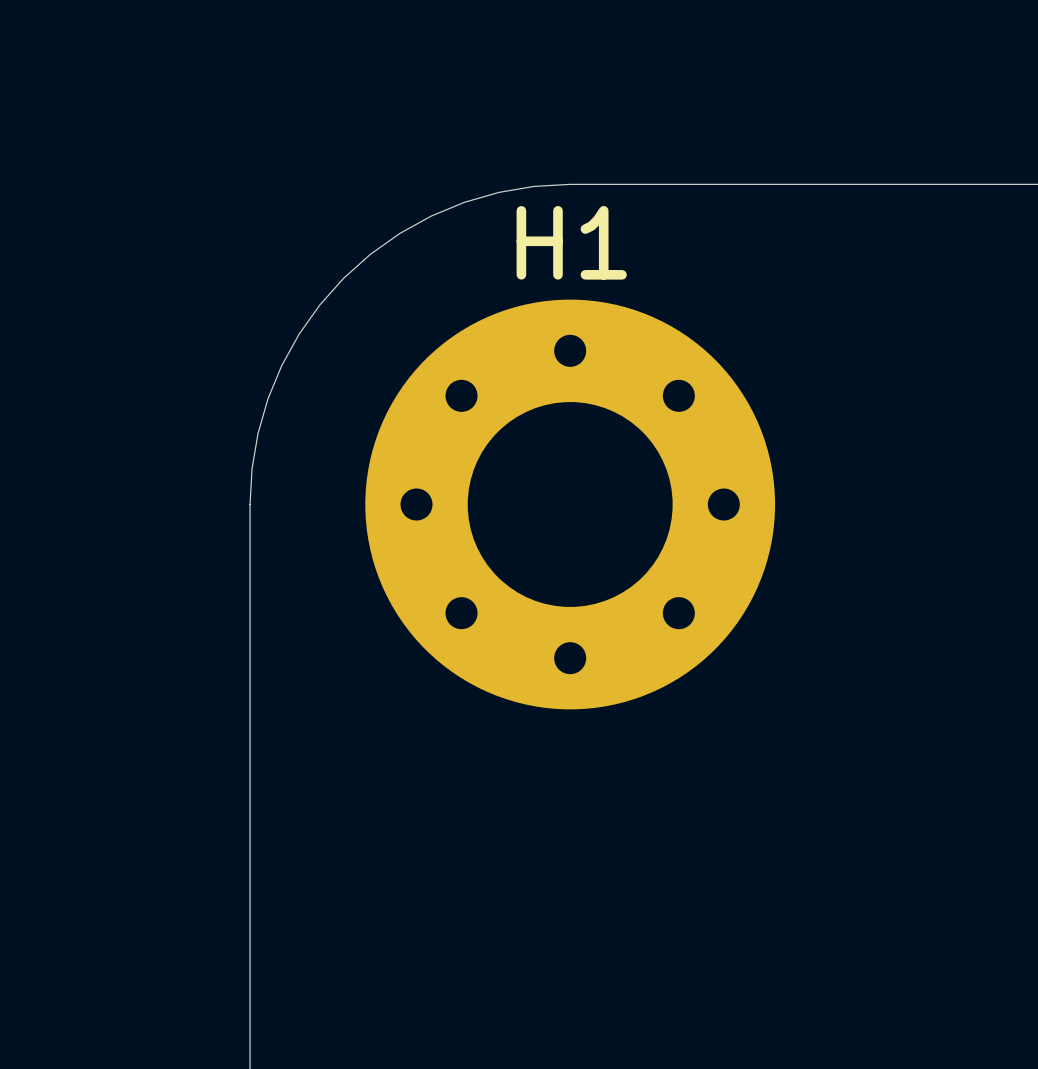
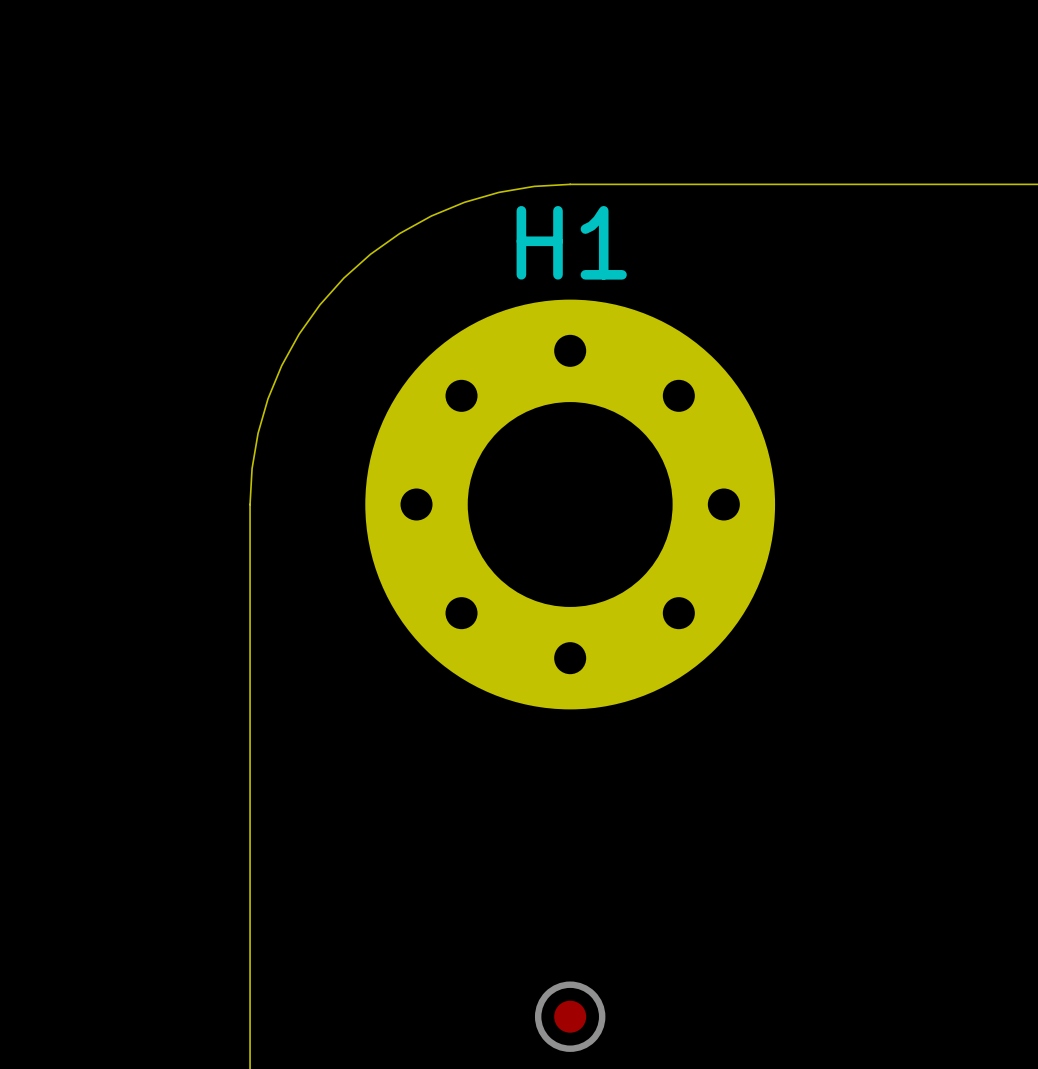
part: none -> (570, 1016)

